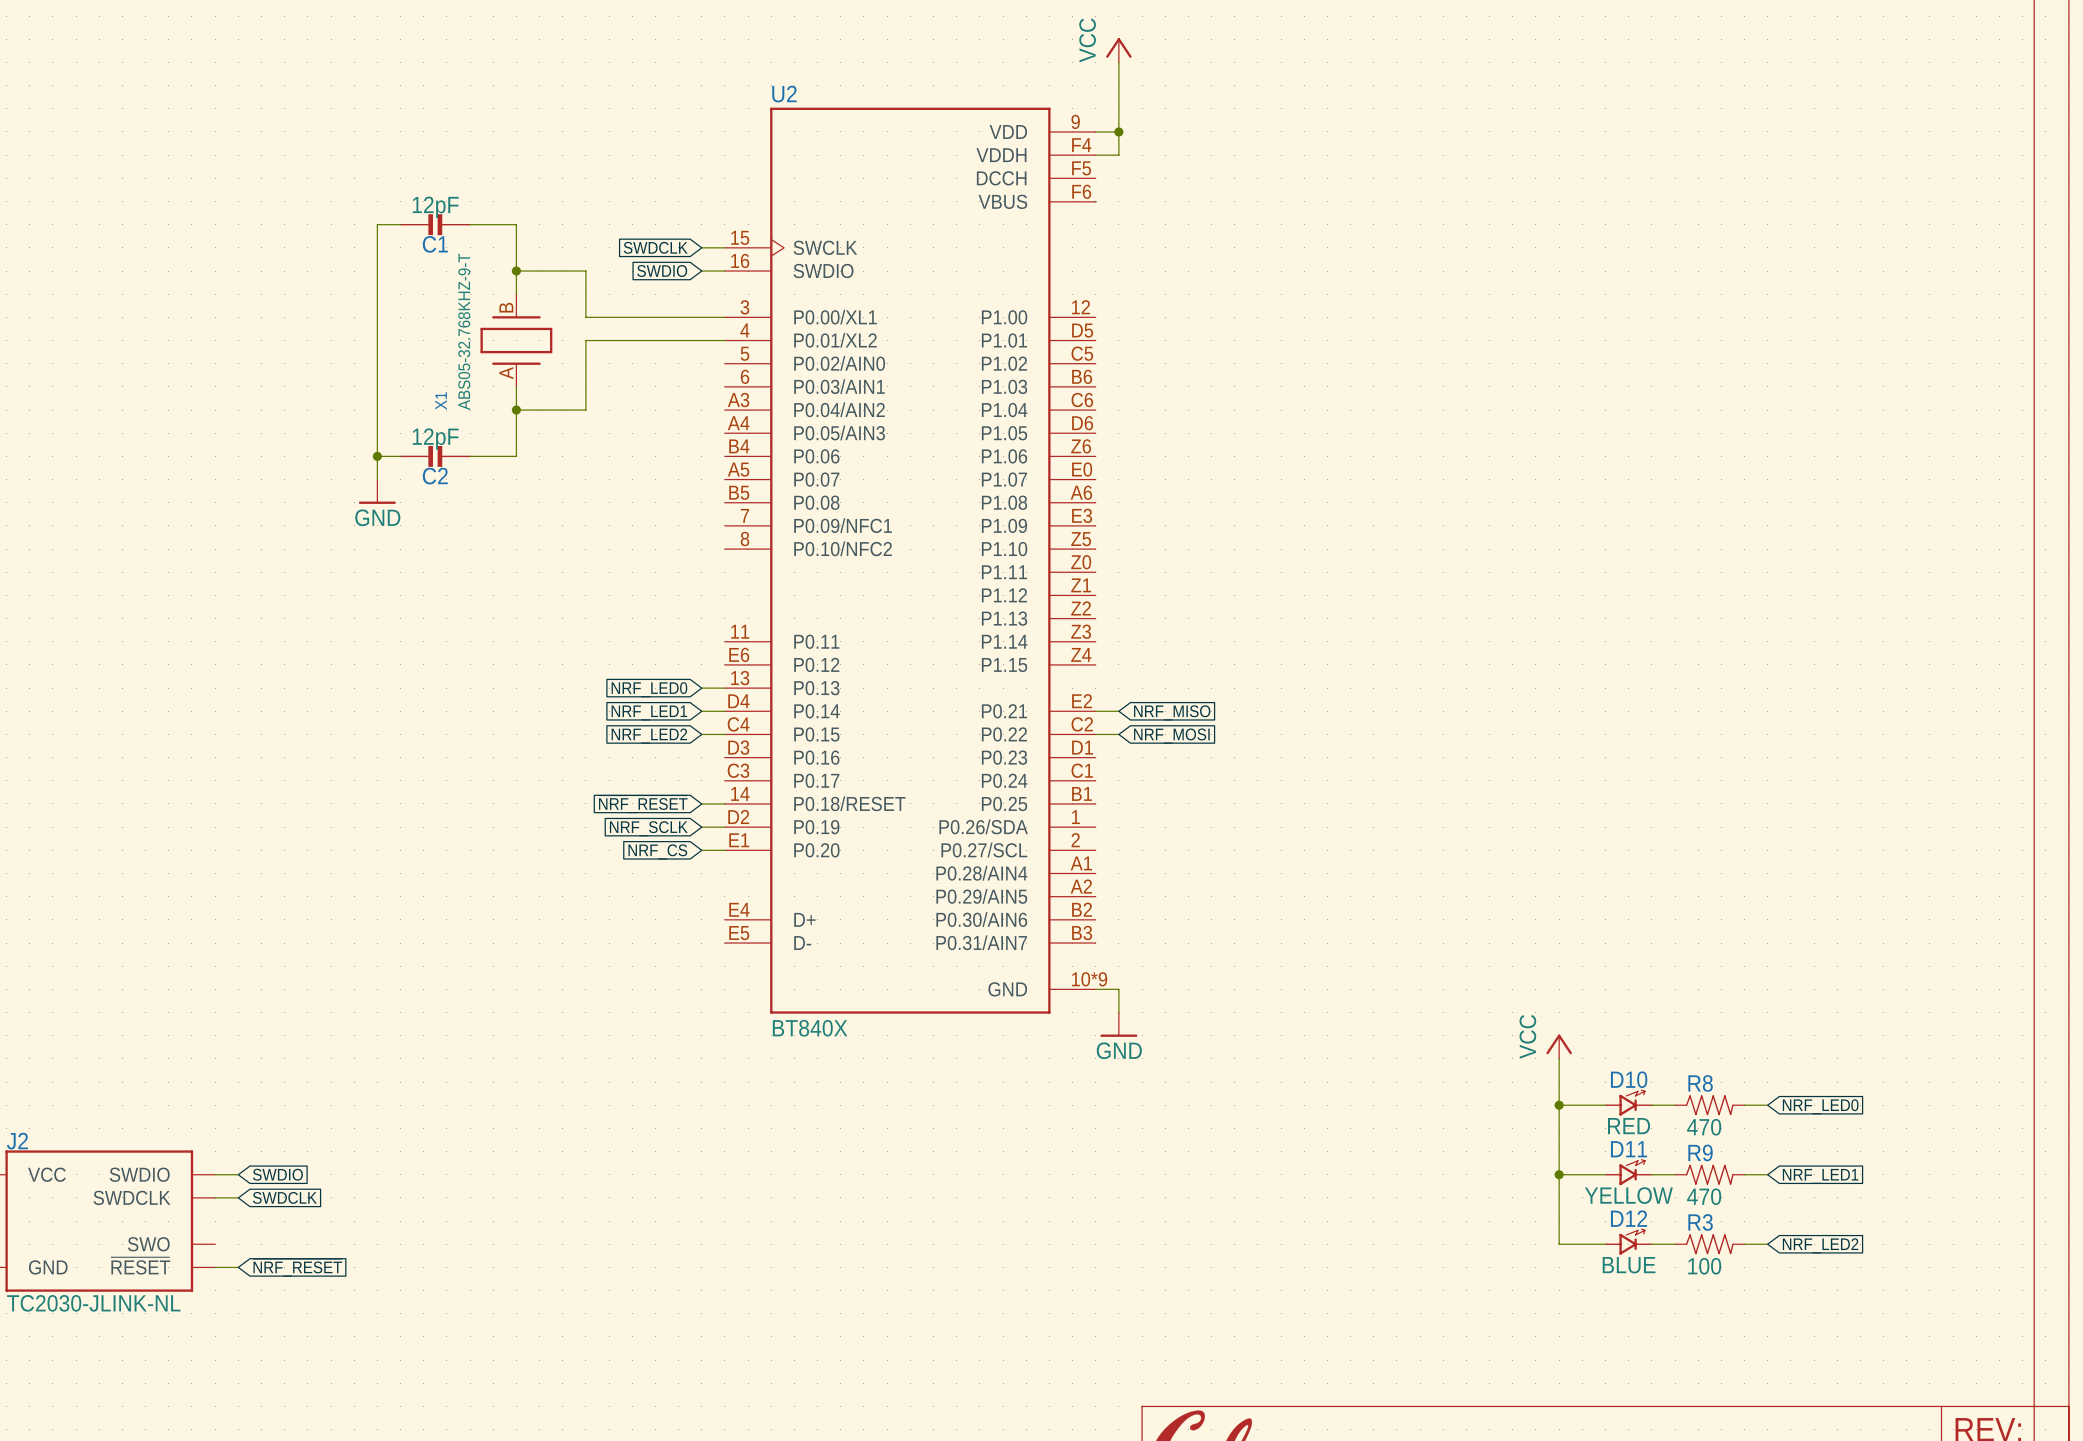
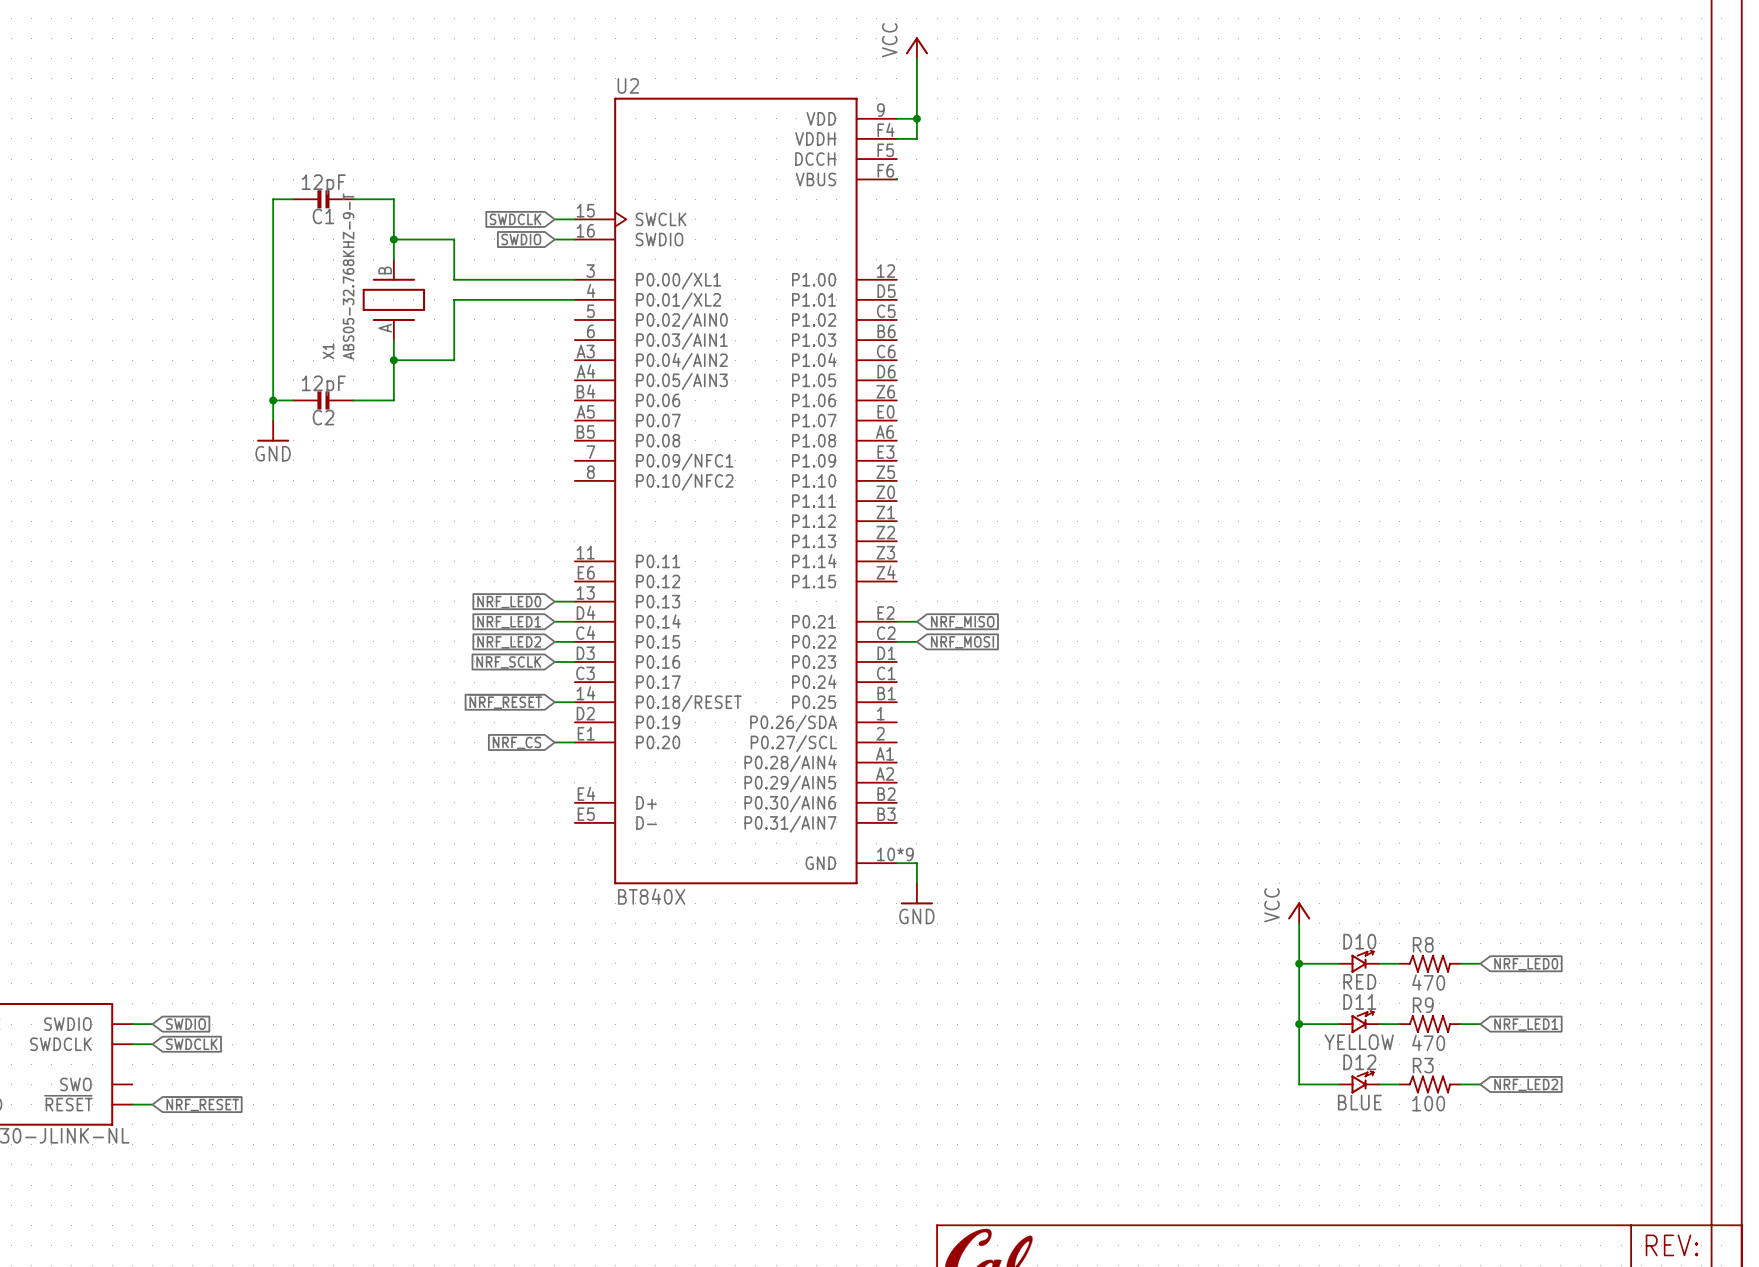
wire: (701, 827) (724, 827) -> (554, 661) (574, 661)
global label position: NRF_SCLK (648, 828) -> NRF_SCLK (508, 662)

